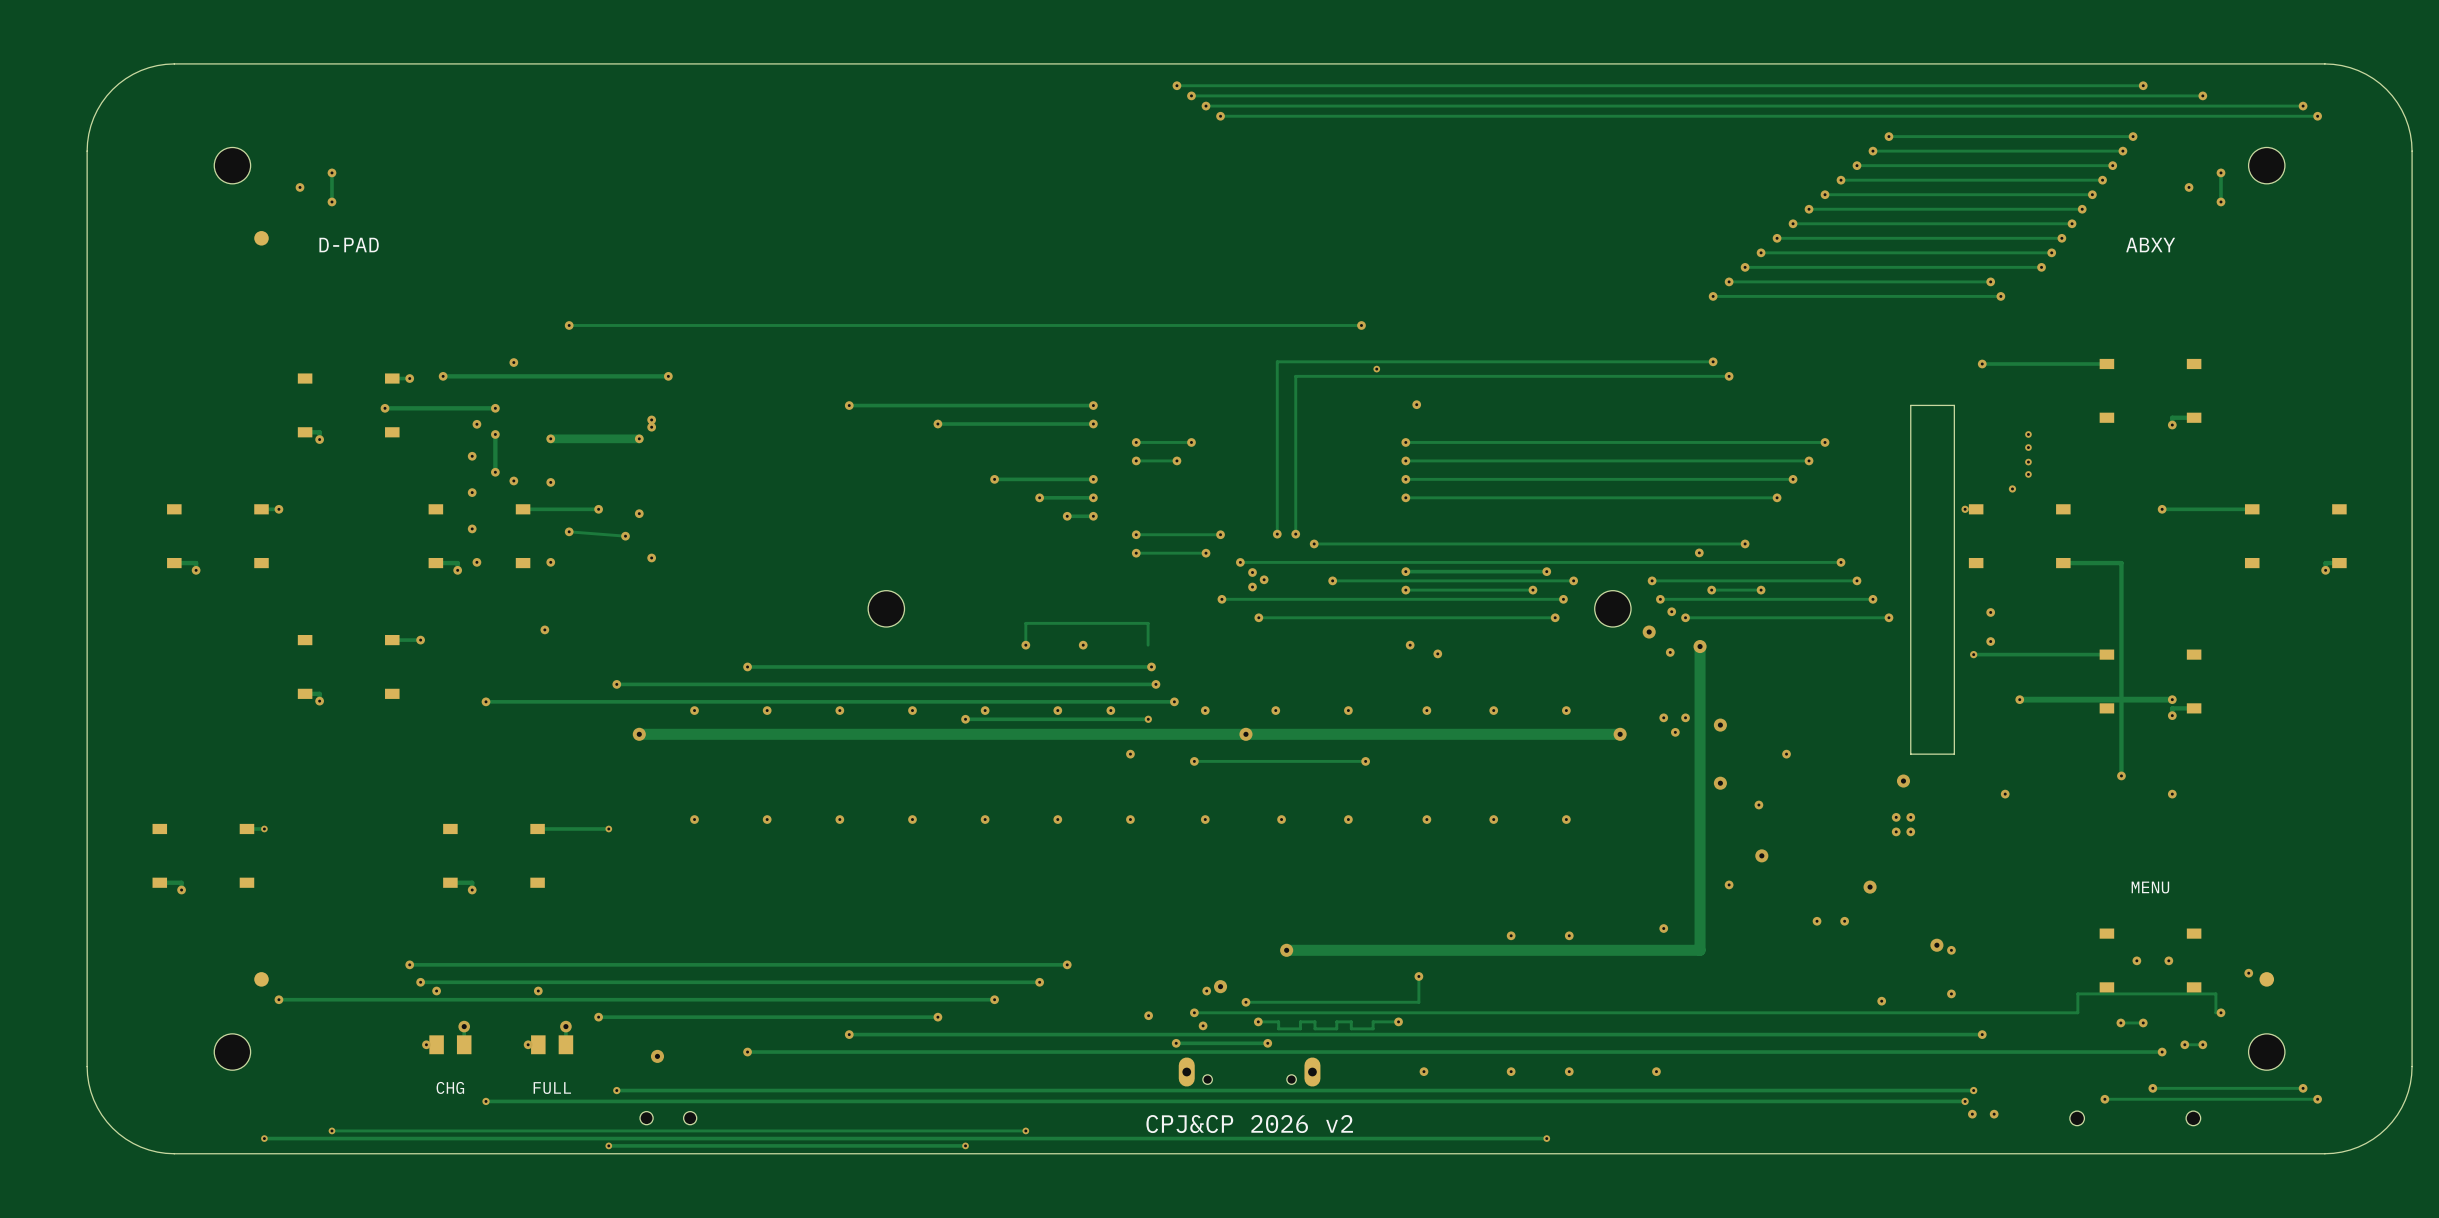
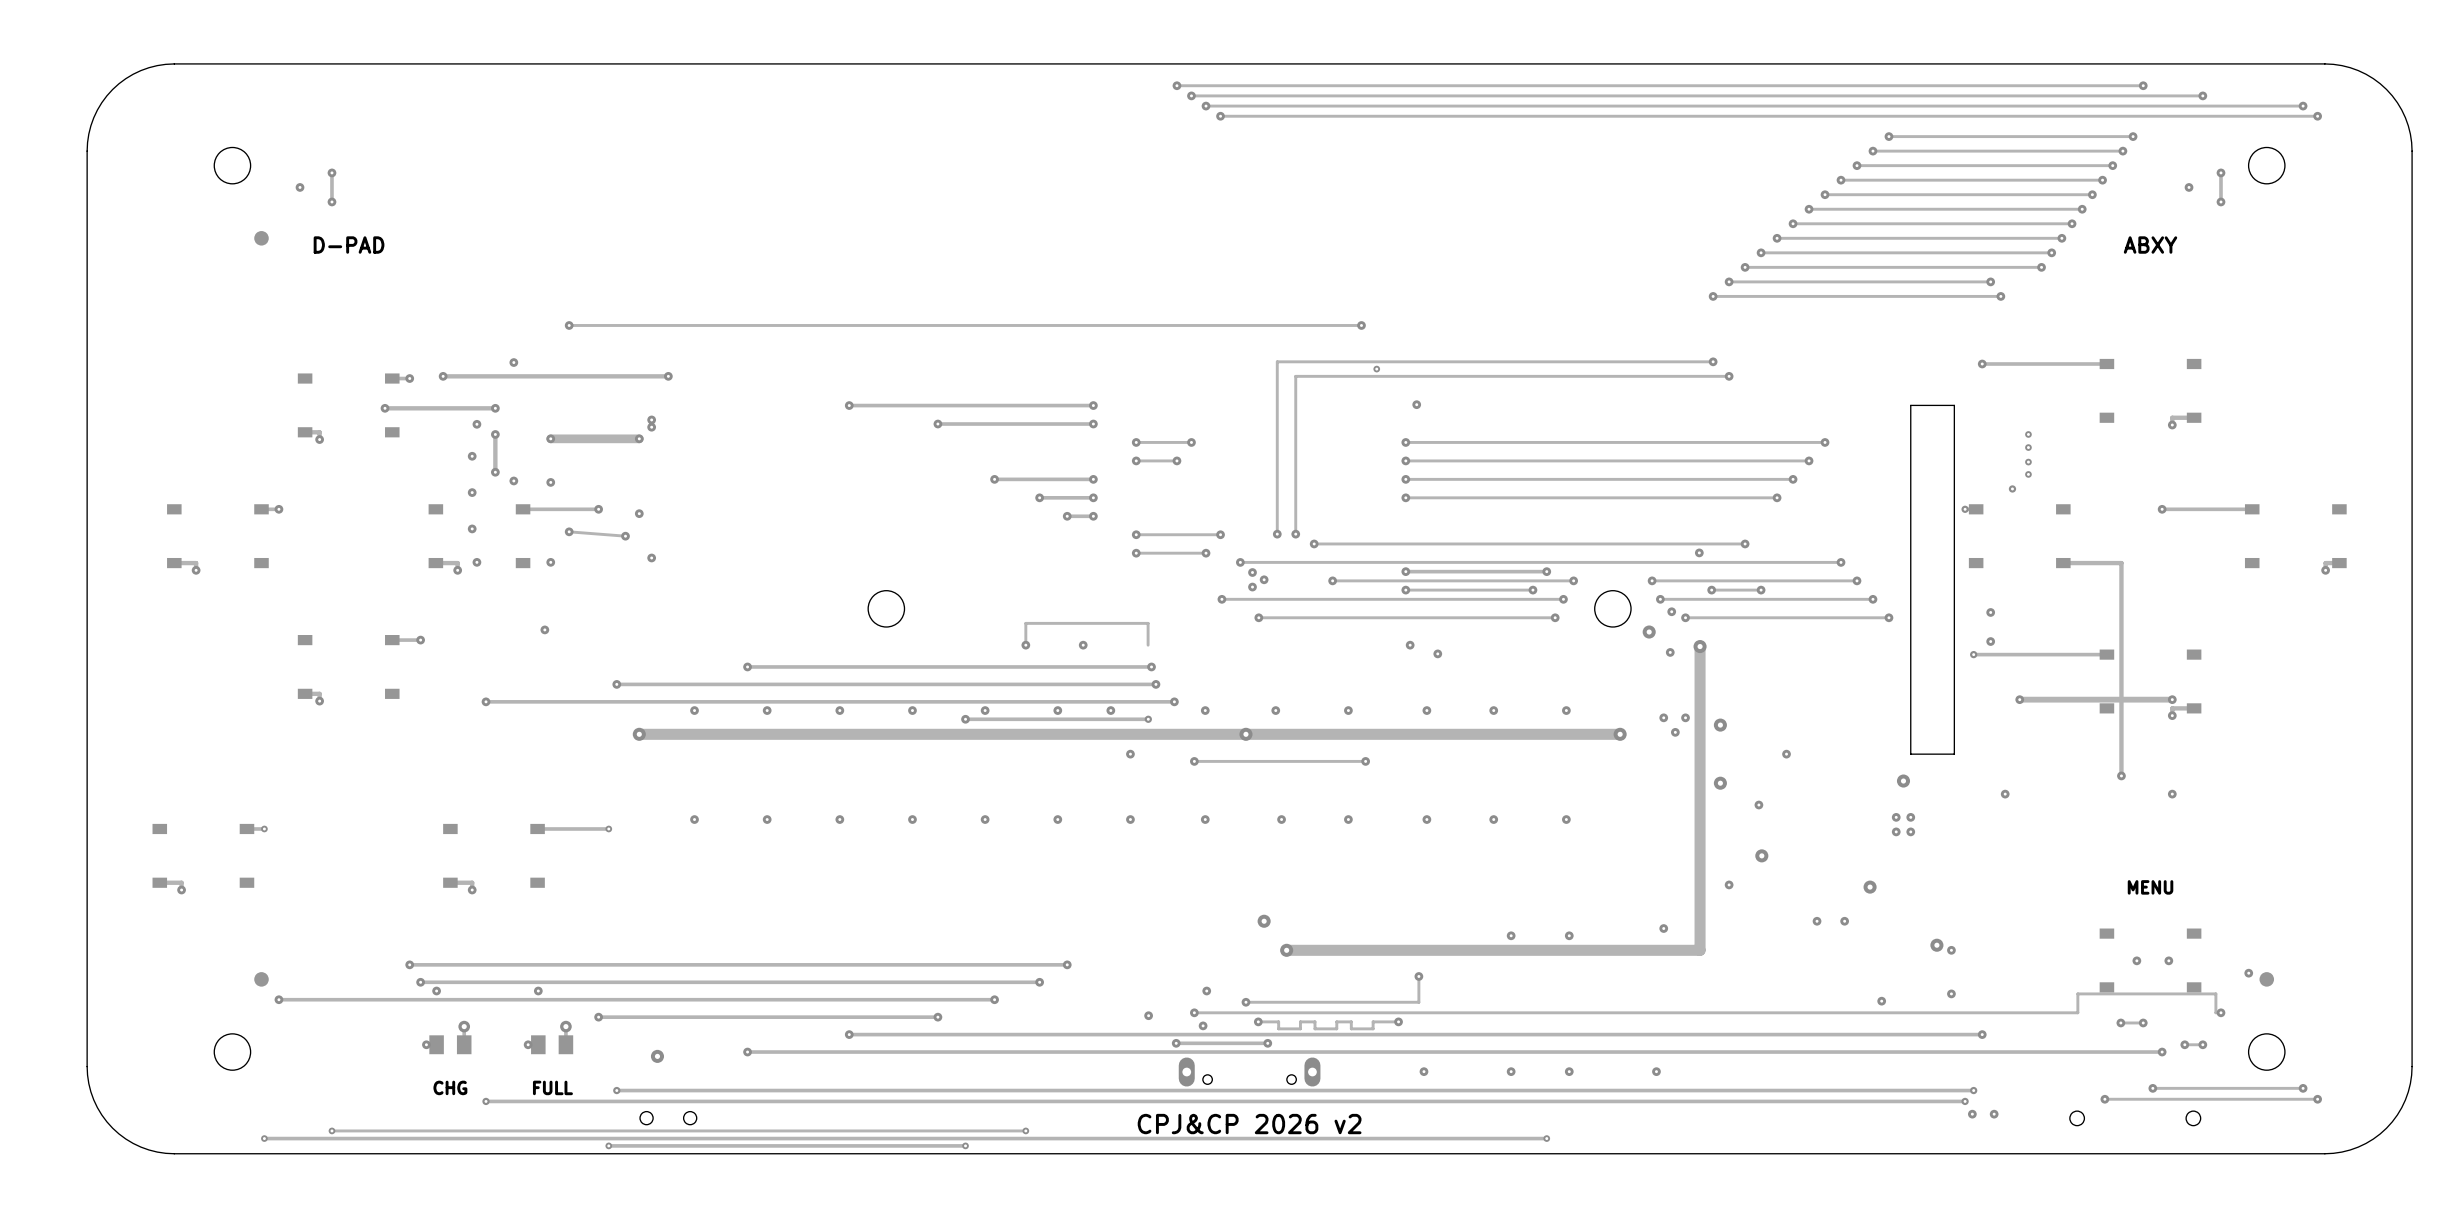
via position: (1220, 986) -> (1264, 921)

